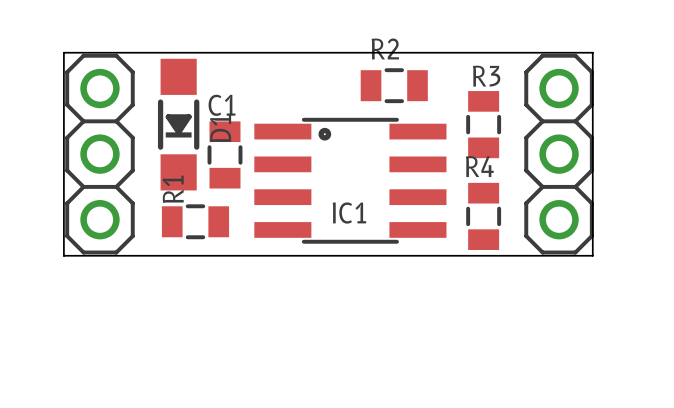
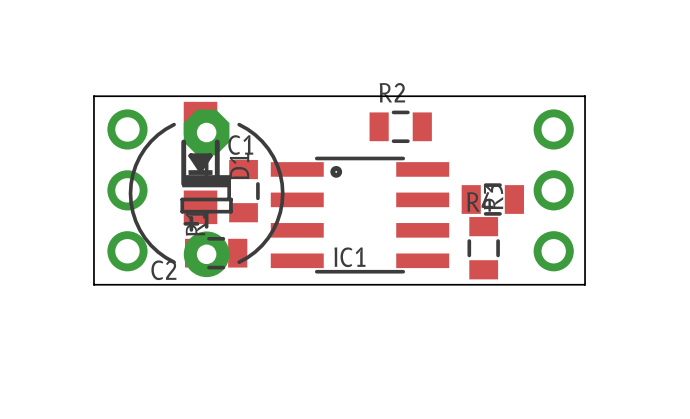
part footprint: [65, 53, 135, 255] -> [107, 109, 148, 272]
part footprint: [524, 53, 594, 255] -> [533, 109, 574, 272]
R3 rotation: 0° (483, 124) -> 90° clockwise (492, 199)
R3 position: (483, 124) -> (492, 199)
C2: none -> (206, 193)
IC1 name position: IC1 (349, 213) -> IC1 (349, 257)

